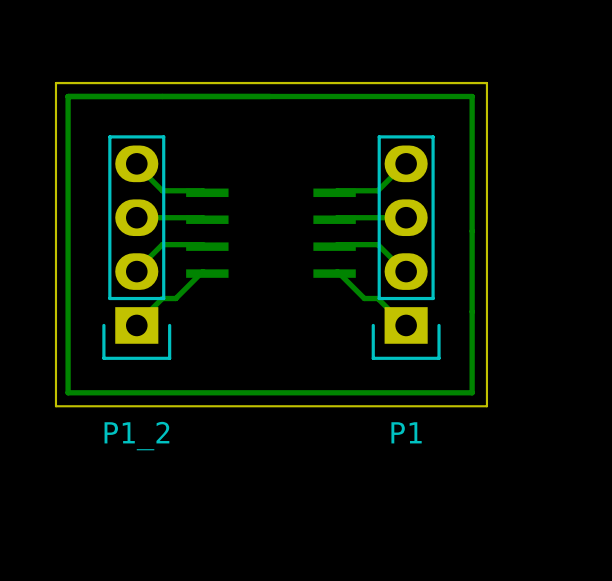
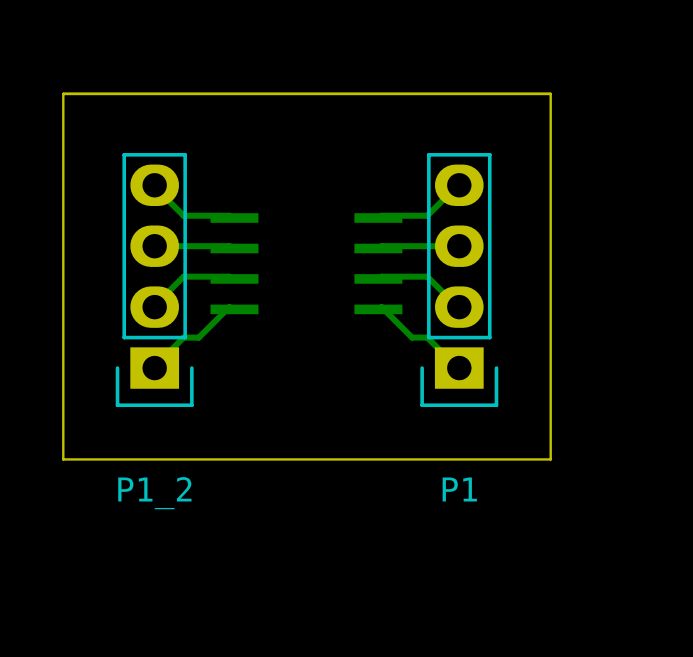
bottom track: (68, 96) (472, 96) (472, 392) (68, 392) (68, 96) -> none

